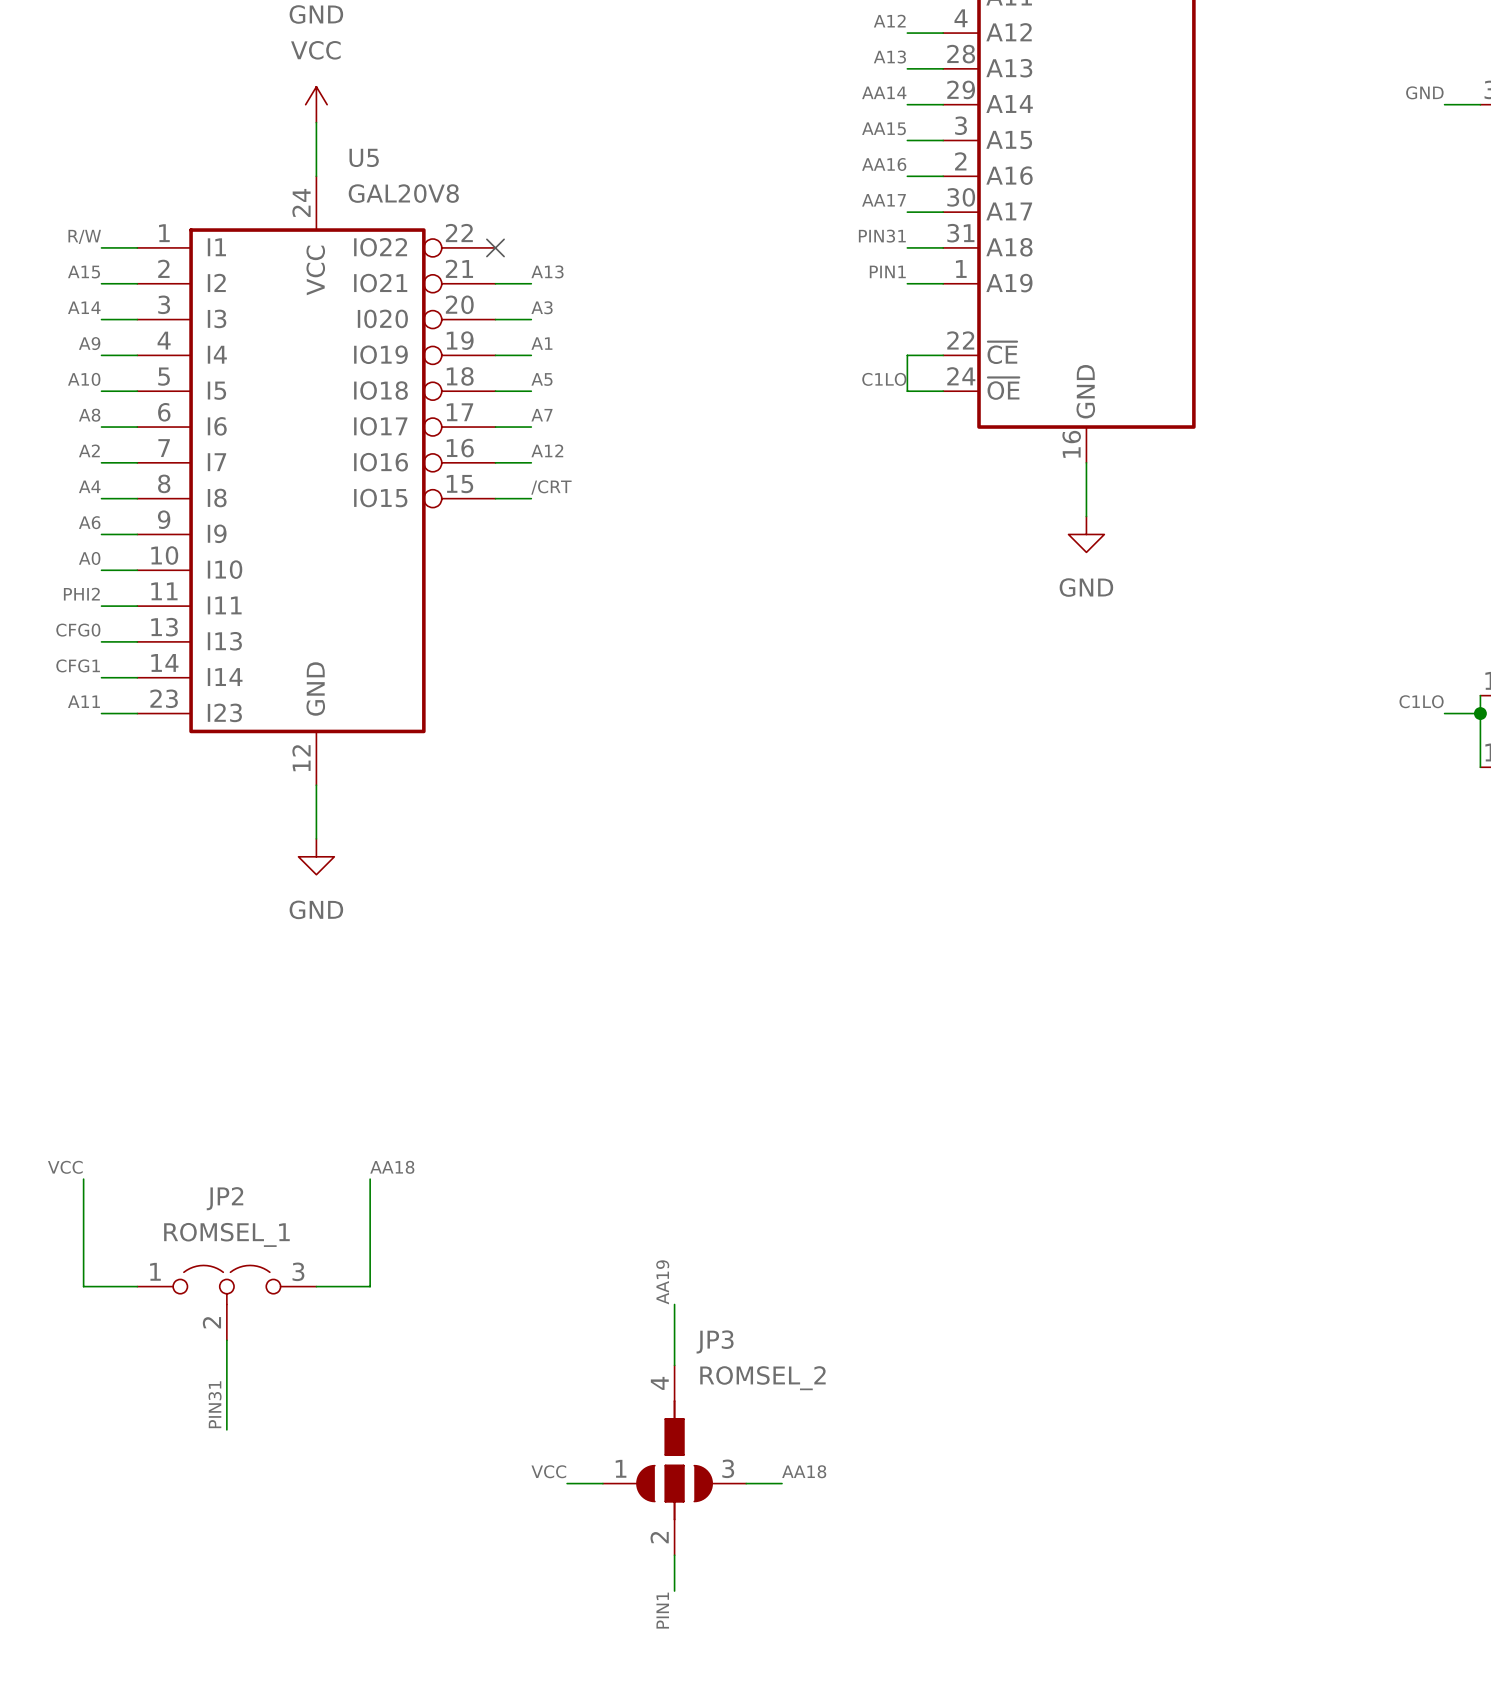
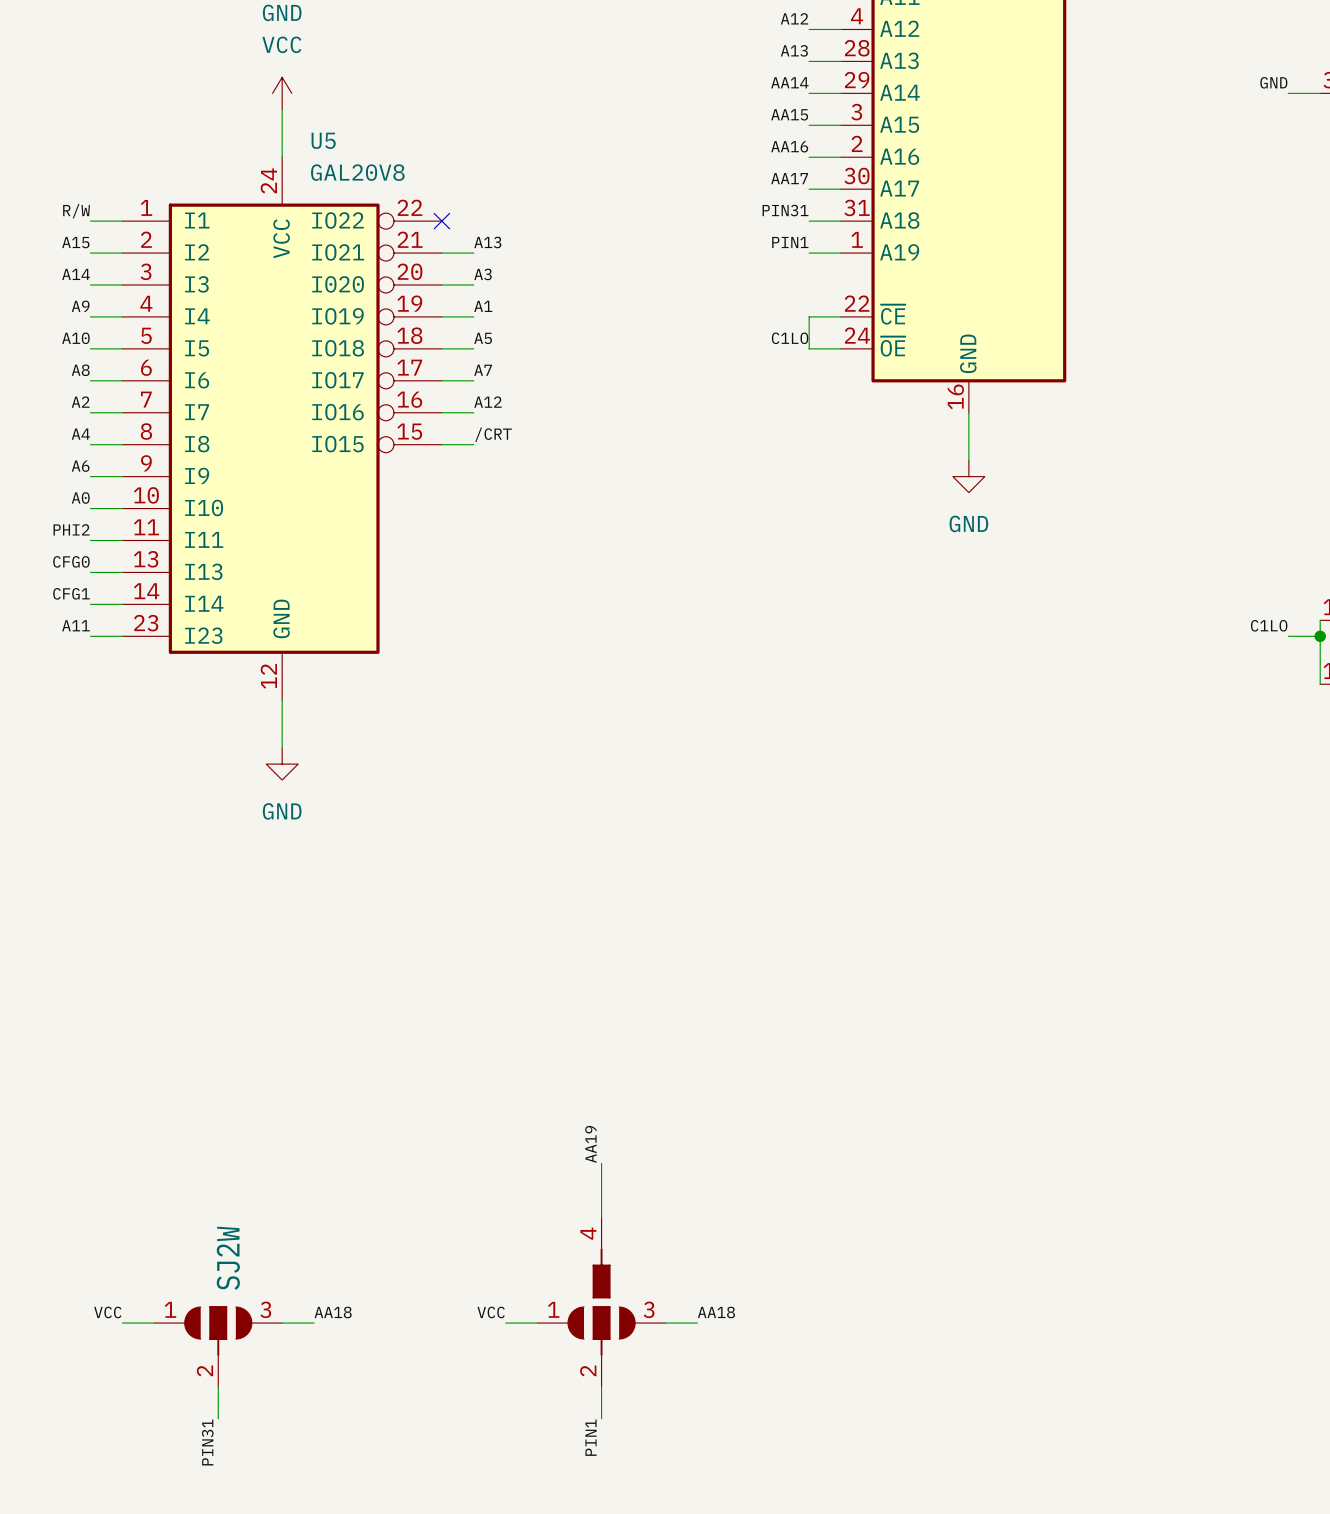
label position: VCC (65, 1167) -> VCC (107, 1312)
label position: AA18 (392, 1167) -> AA18 (333, 1312)
wire: (83, 1179) (83, 1286) (137, 1286) -> none
wire: (370, 1179) (370, 1286) (316, 1286) -> none
JP2: ROMSEL_1 (226, 1302) -> none
wire: (226, 1340) (226, 1429) -> none
JP3 name: JP3 (715, 1341) -> none
JP3 value: ROMSEL_2 (762, 1378) -> none
label position: PIN31 (215, 1404) -> PIN31 (207, 1442)
wire: none -> (122, 1323) (154, 1323)
wire: none -> (282, 1323) (314, 1323)
part: none -> SJ2W (218, 1346)
wire: none -> (218, 1386) (218, 1418)

